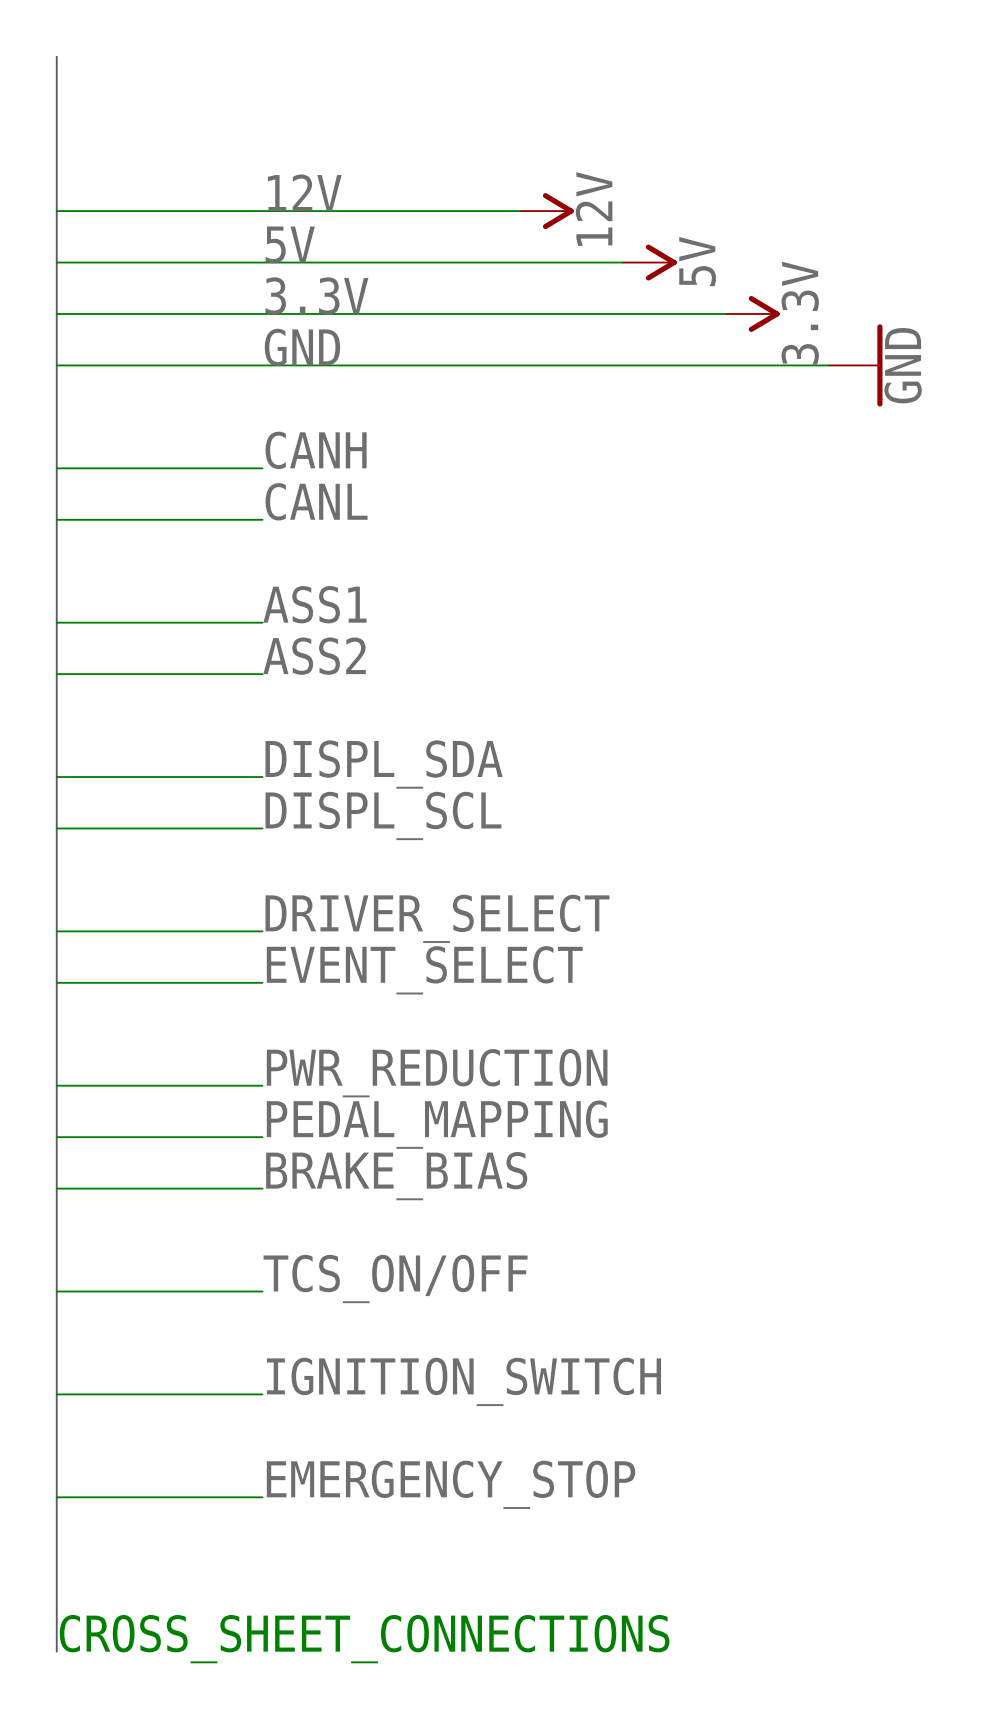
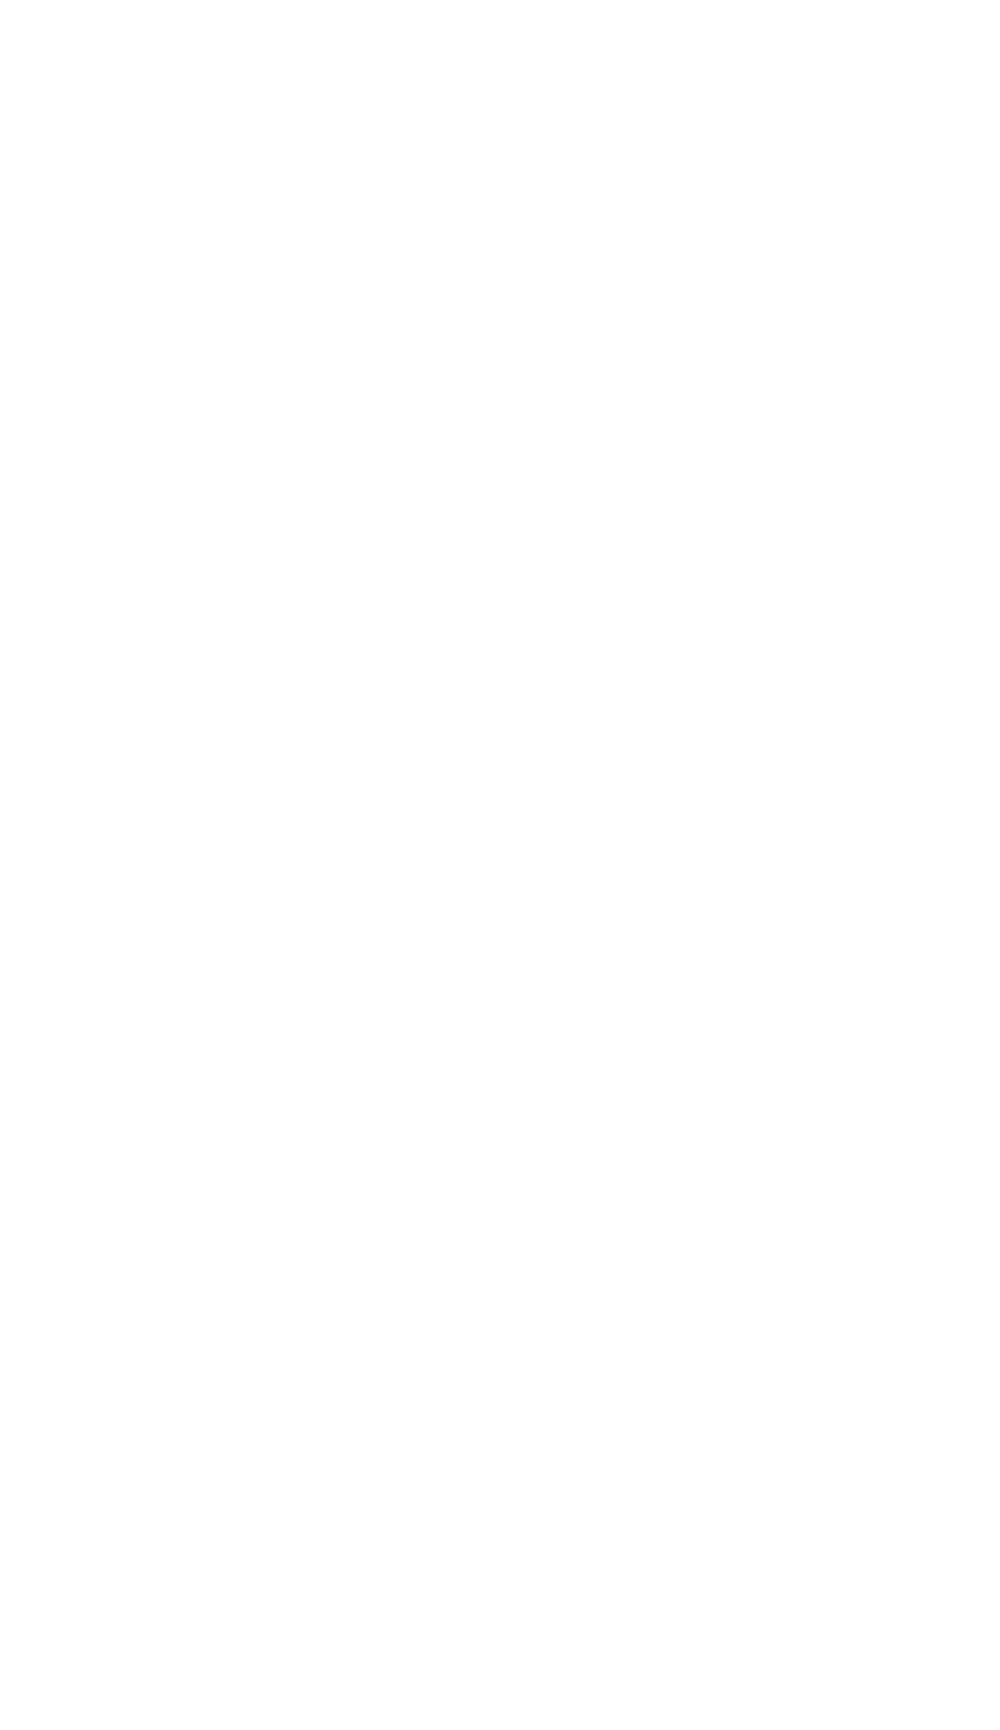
bus: (56, 56) (56, 1651) -> none
label: 12V (304, 192) -> none
wire: (56, 211) (519, 211) -> none
power symbol: 12V (546, 211) -> none
label: 5V (290, 244) -> none
wire: (56, 262) (622, 262) -> none
power symbol: 5V (649, 262) -> none
label: 3.3V (316, 296) -> none
wire: (56, 313) (725, 313) -> none
power symbol: 3.3V (752, 313) -> none
label: GND (302, 347) -> none
wire: (56, 365) (828, 365) -> none
power symbol: GND (855, 365) -> none
label: CANH (316, 450) -> none
wire: (56, 468) (262, 468) -> none
label: CANL (316, 501) -> none
wire: (56, 519) (262, 519) -> none
label: ASS1 (314, 604) -> none
wire: (56, 622) (262, 622) -> none
label: ASS2 (314, 656) -> none
wire: (56, 674) (262, 674) -> none
label: DISPL_SDA (384, 764) -> none
wire: (56, 777) (262, 777) -> none
label: DISPL_SCL (383, 815) -> none
wire: (56, 828) (262, 828) -> none
label: DRIVER_SELECT (437, 918) -> none
wire: (56, 931) (262, 931) -> none
label: EVENT_SELECT (424, 970) -> none
wire: (56, 982) (262, 982) -> none
label: PWR_REDUCTION (437, 1073) -> none
wire: (56, 1085) (262, 1085) -> none
label: PEDAL_MAPPING (437, 1124) -> none
wire: (56, 1137) (262, 1137) -> none
label: BRAKE_BIAS (396, 1176) -> none
wire: (56, 1188) (262, 1188) -> none
label: TCS_ON/OFF (395, 1279) -> none
wire: (56, 1291) (262, 1291) -> none
label: IGNITION_SWITCH (463, 1381) -> none
wire: (56, 1394) (262, 1394) -> none
label: EMERGENCY_STOP (451, 1484) -> none
wire: (56, 1497) (262, 1497) -> none
text: CROSS_SHEET_CONNECTIONS (364, 1639) -> none

